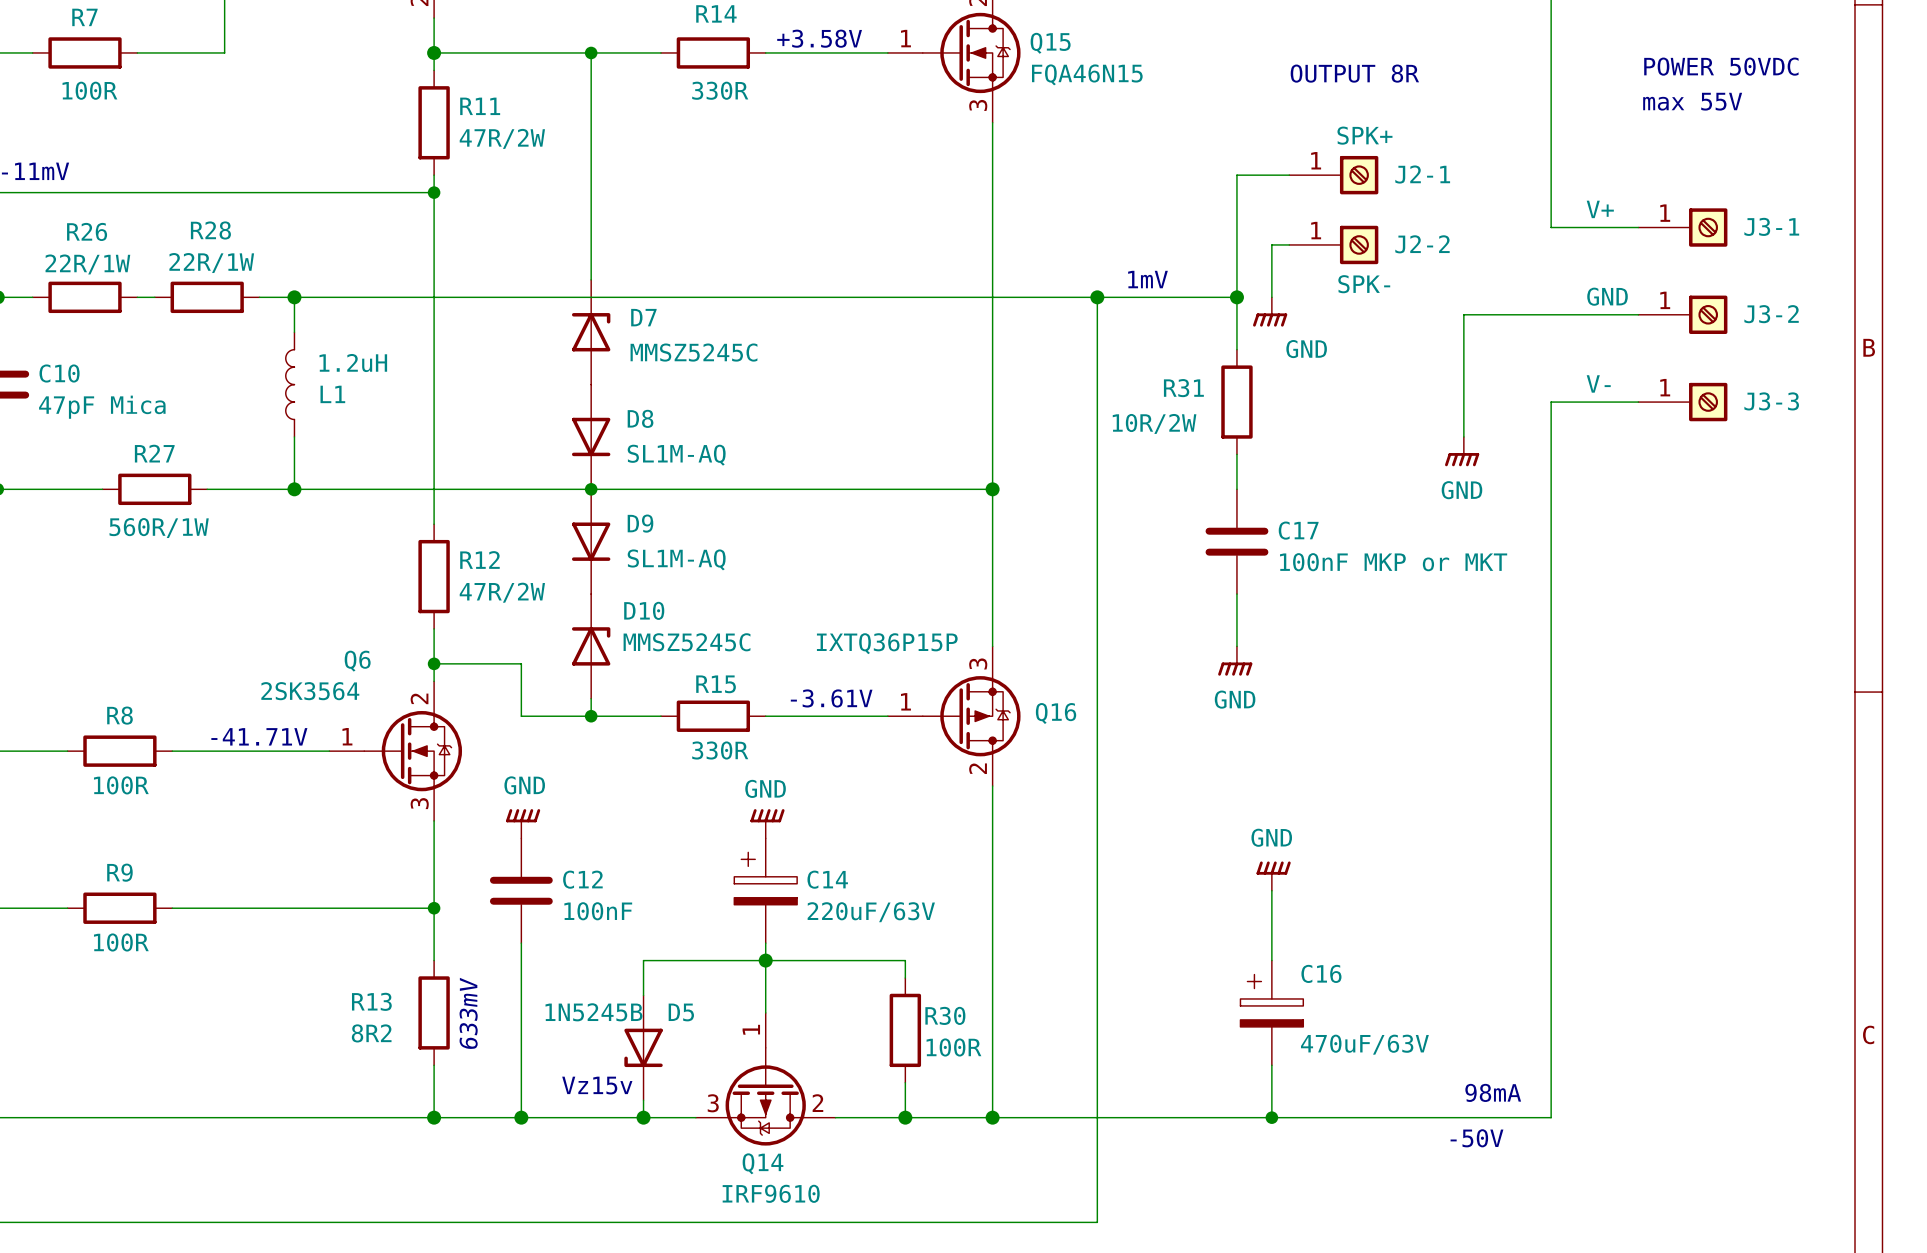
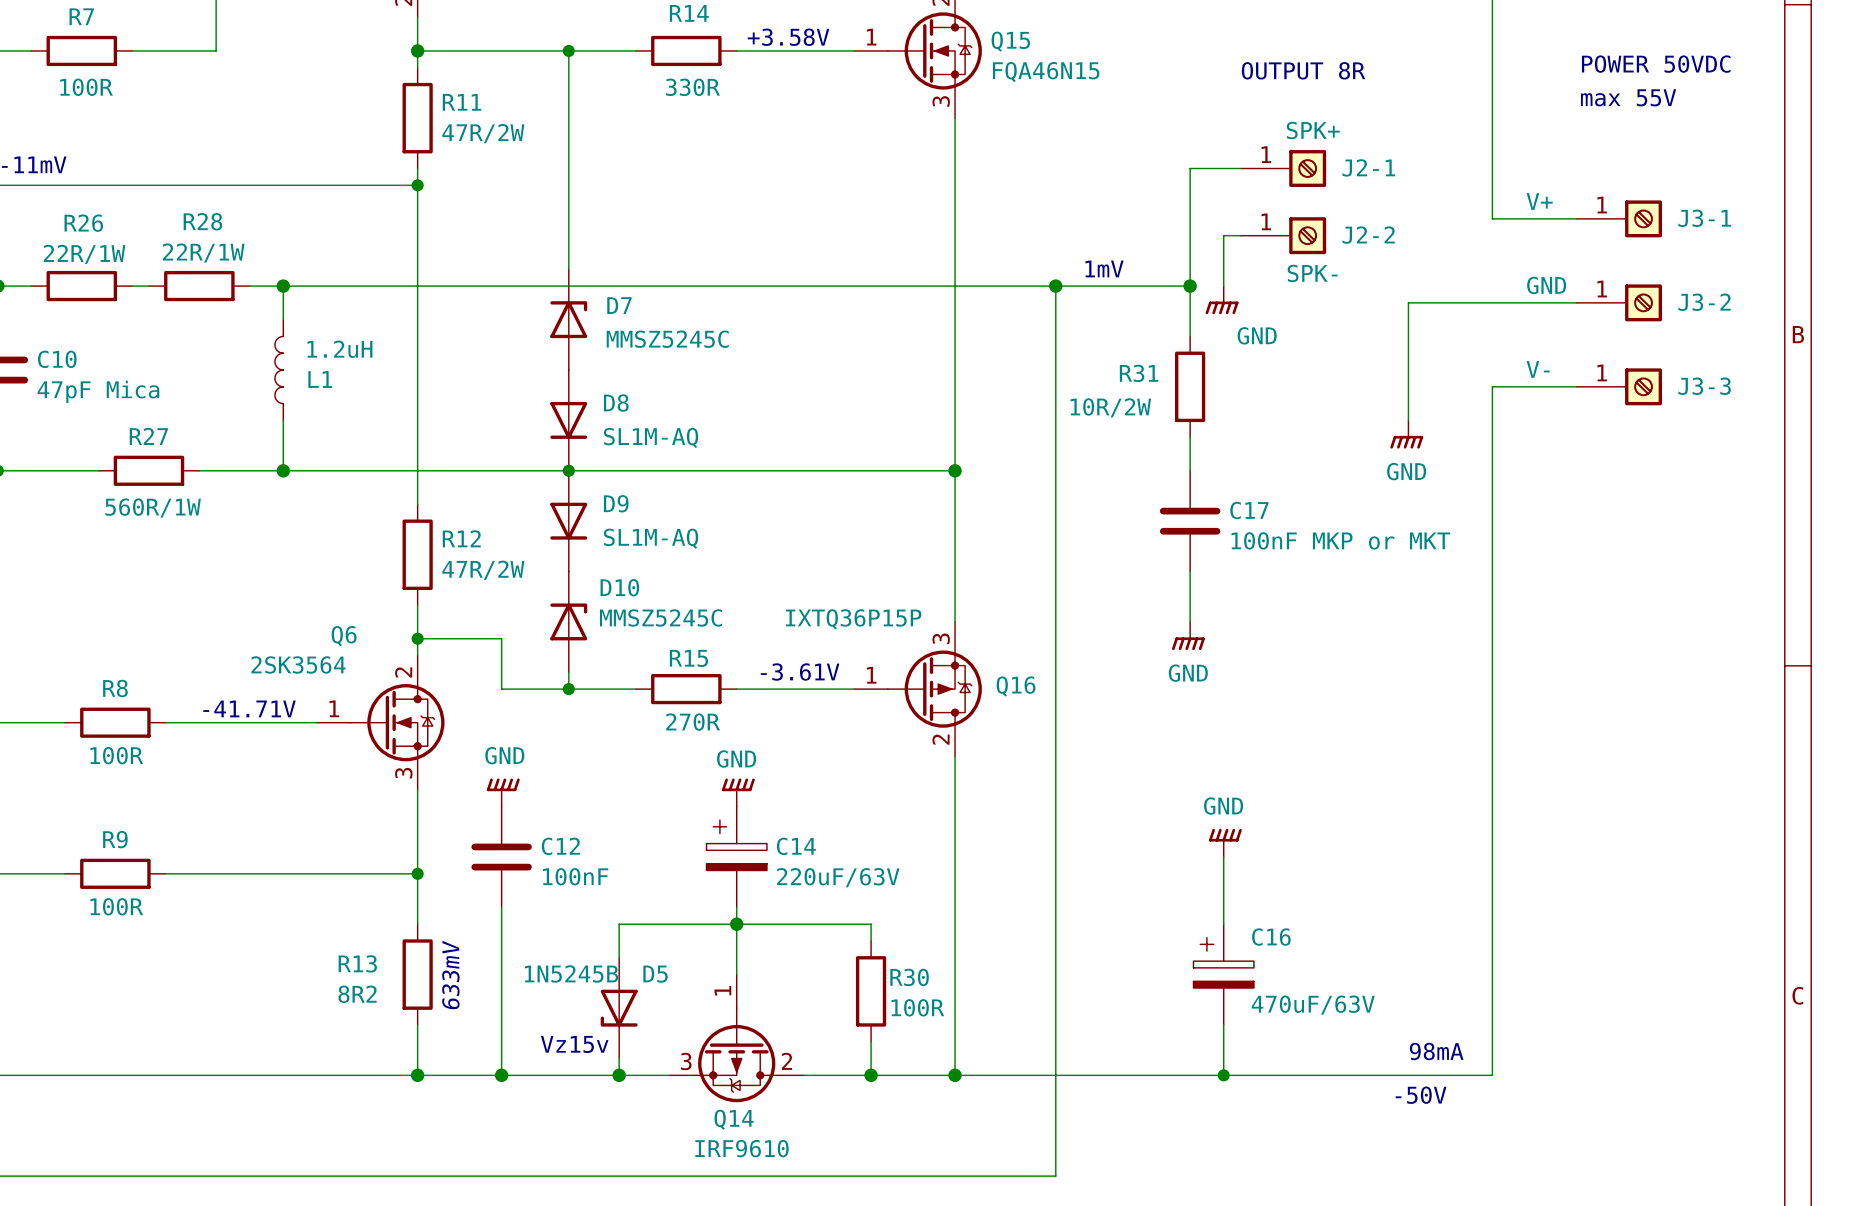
R15 value: 330R (720, 750) -> 270R (693, 722)

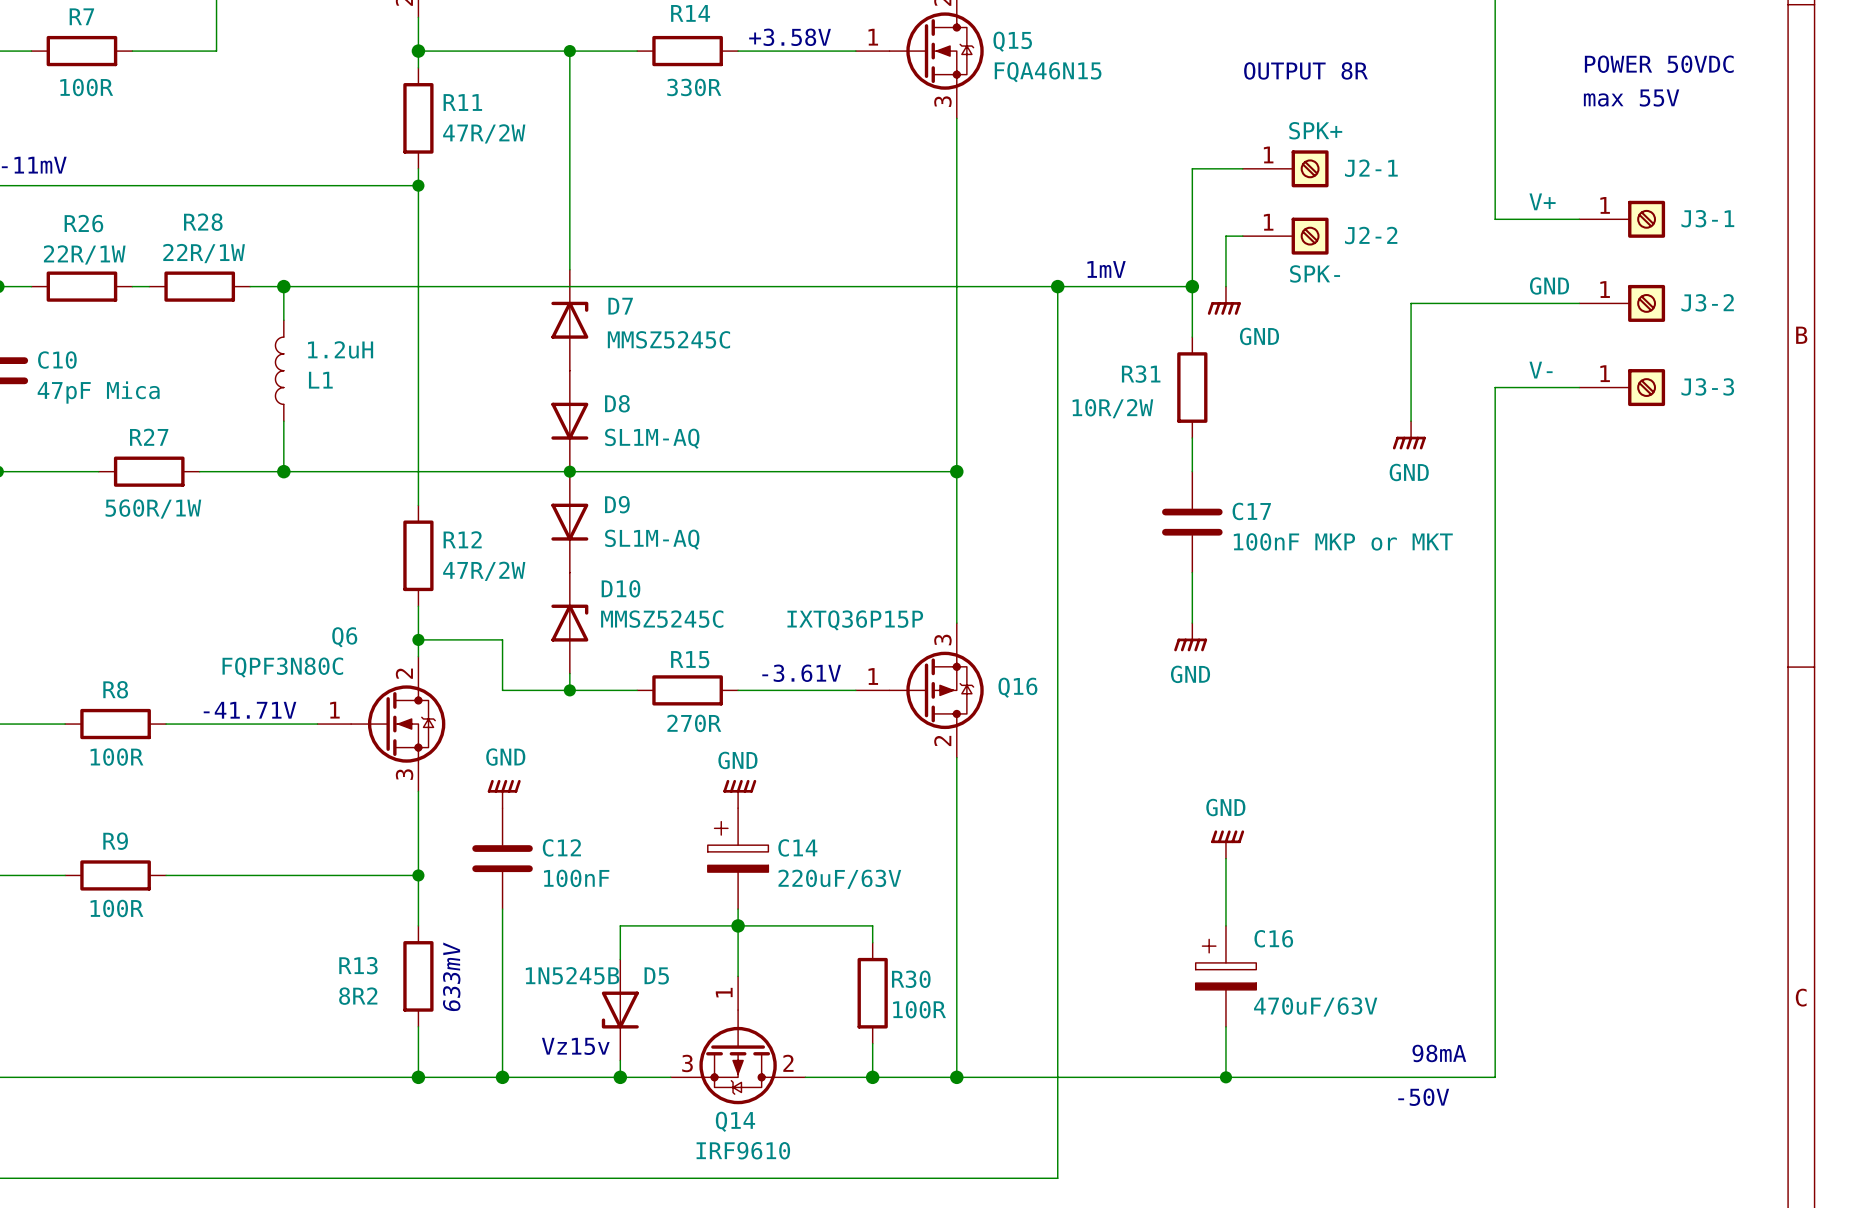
Q6 value: 2SK3564 (298, 664) -> FQPF3N80C (282, 667)

